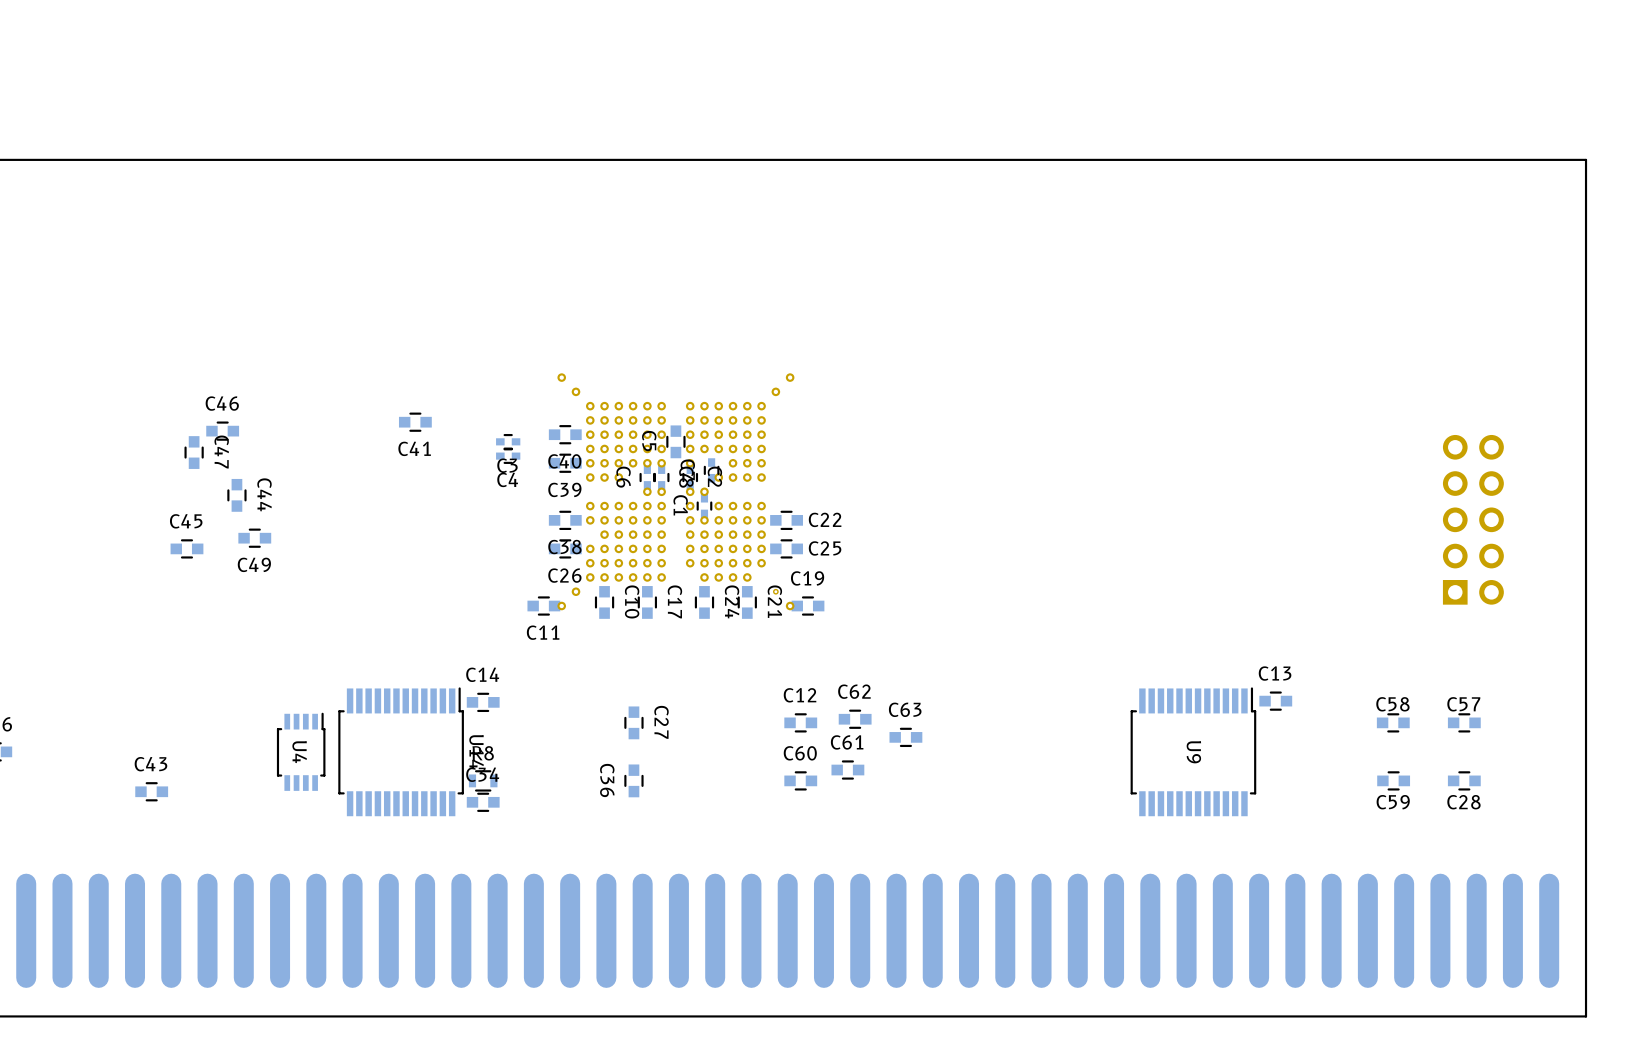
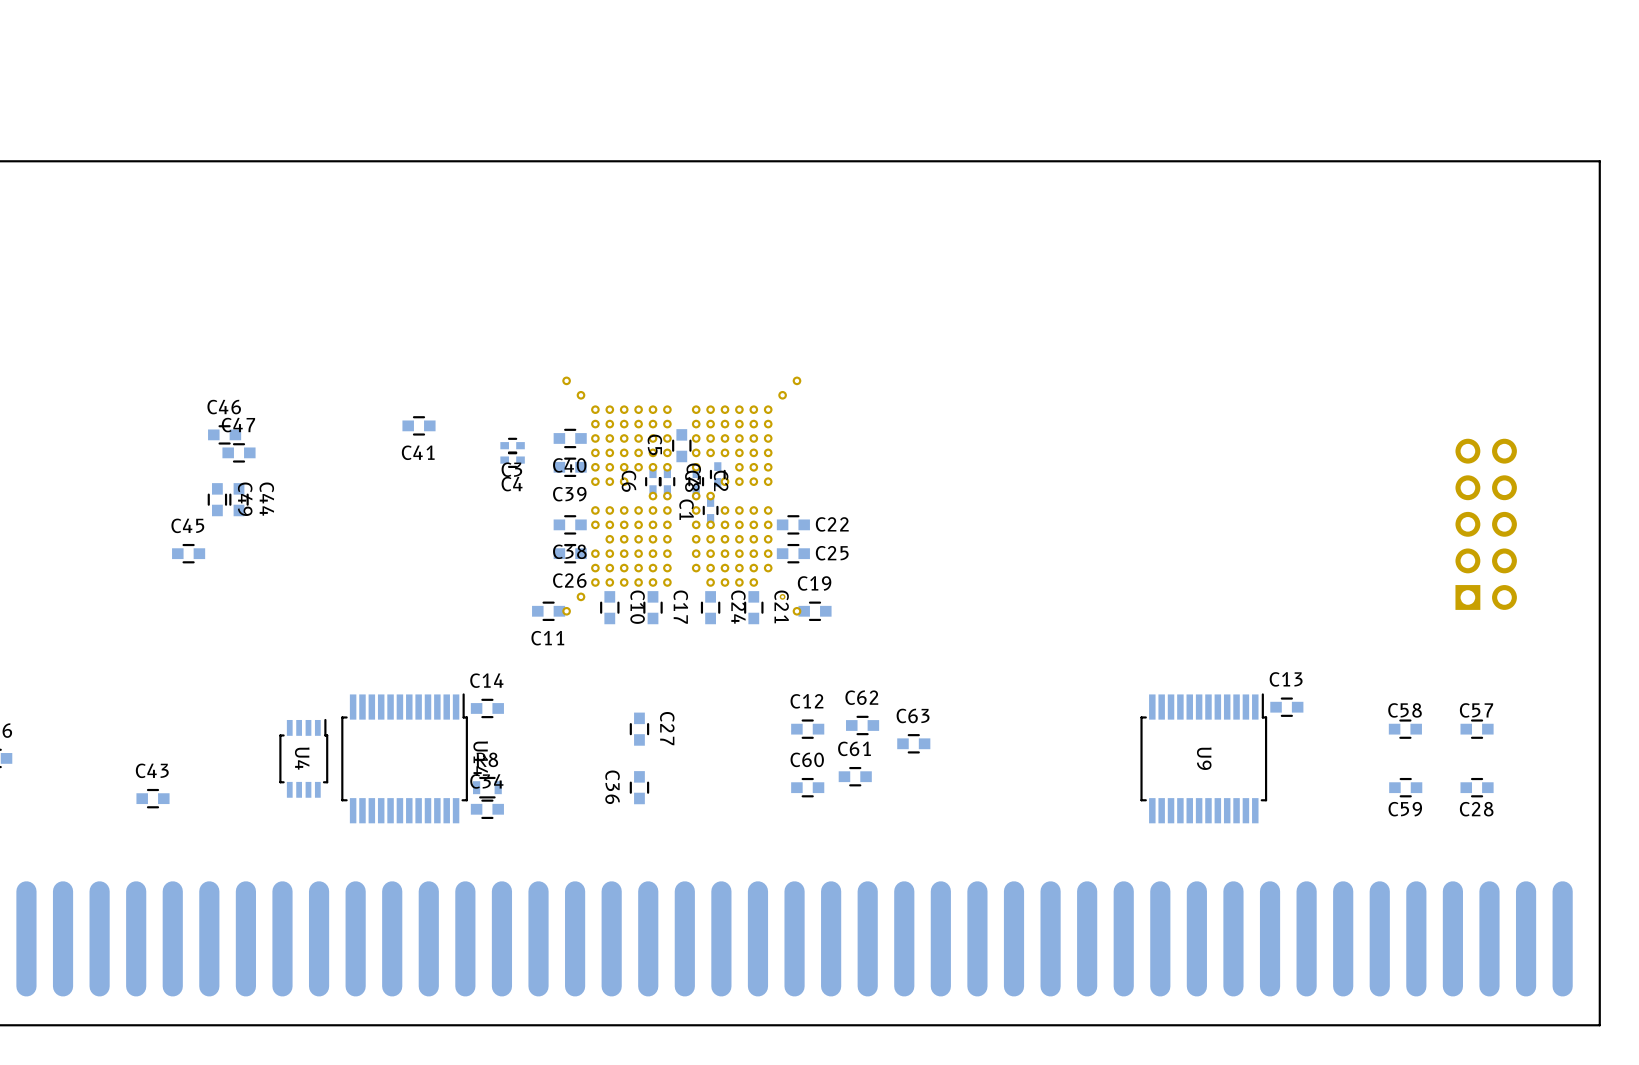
C47 rotation: 0° (194, 452) -> 90° clockwise (239, 452)
C47 position: (194, 452) -> (239, 452)
C47 name position: C47 (221, 452) -> C47 (238, 425)
C49 rotation: 0° (254, 538) -> 90° clockwise (217, 499)
C49 position: (254, 538) -> (217, 499)
C49 name position: C49 (254, 564) -> C49 (245, 499)

